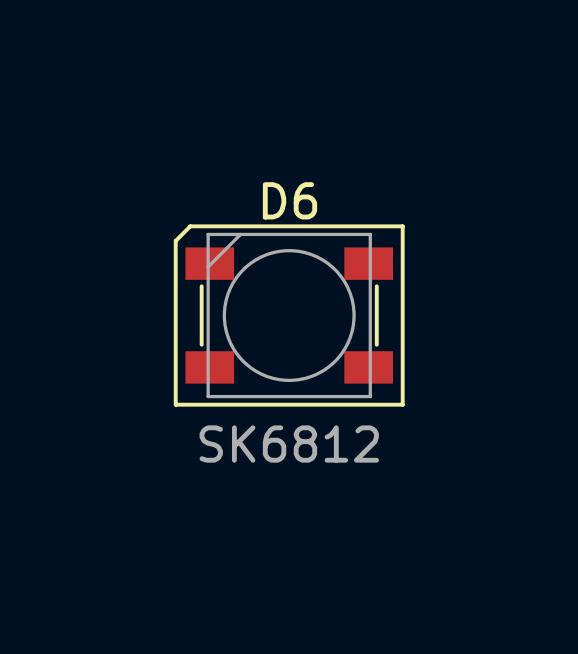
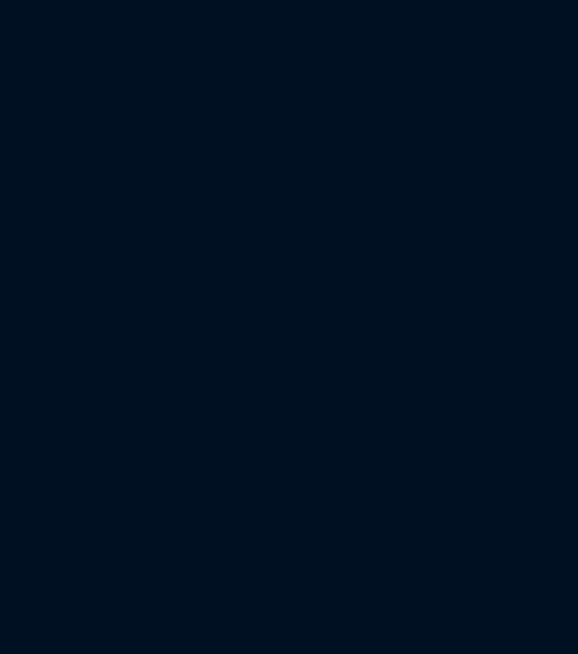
D6: SK6812 (289, 315) -> none

